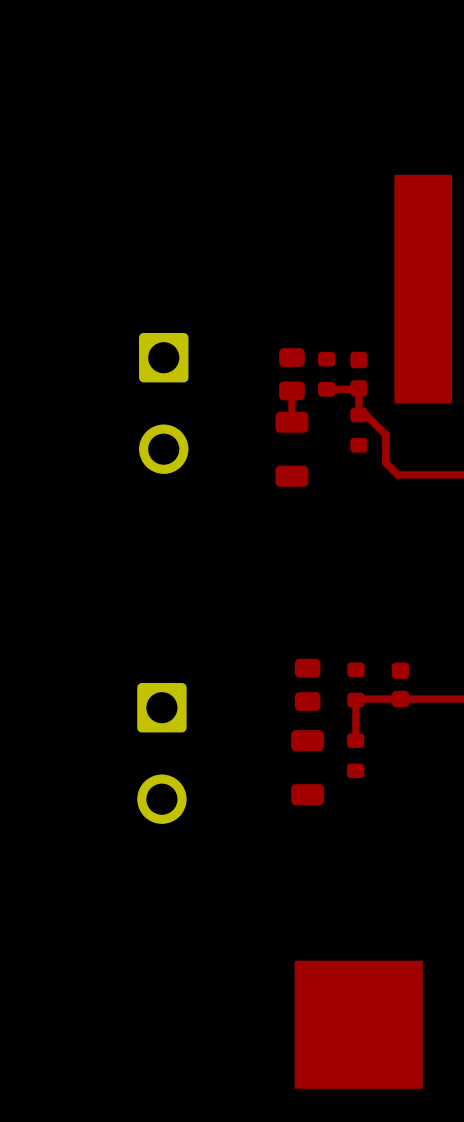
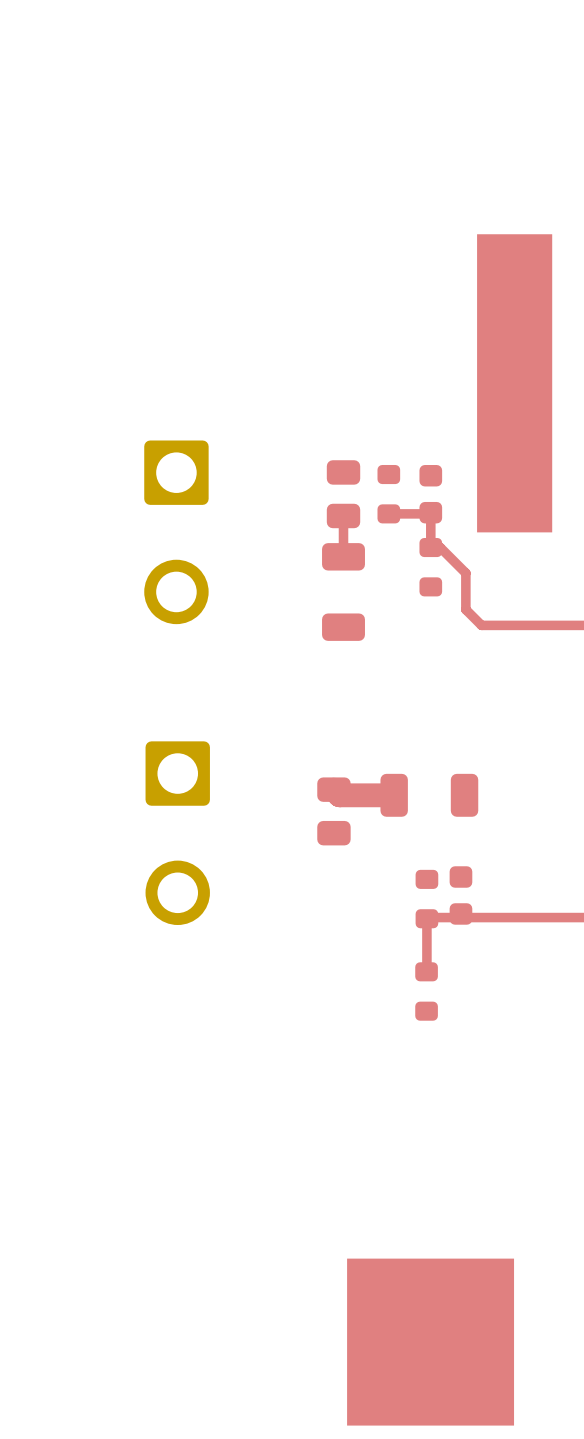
top track: none -> (333, 789) (339, 795) (394, 795)
part position: (307, 684) -> (333, 811)
part position: (400, 684) -> (460, 895)
part position: (161, 753) -> (177, 833)
part rotation: 0° (307, 767) -> 90° clockwise (429, 795)
part position: (307, 767) -> (429, 795)

